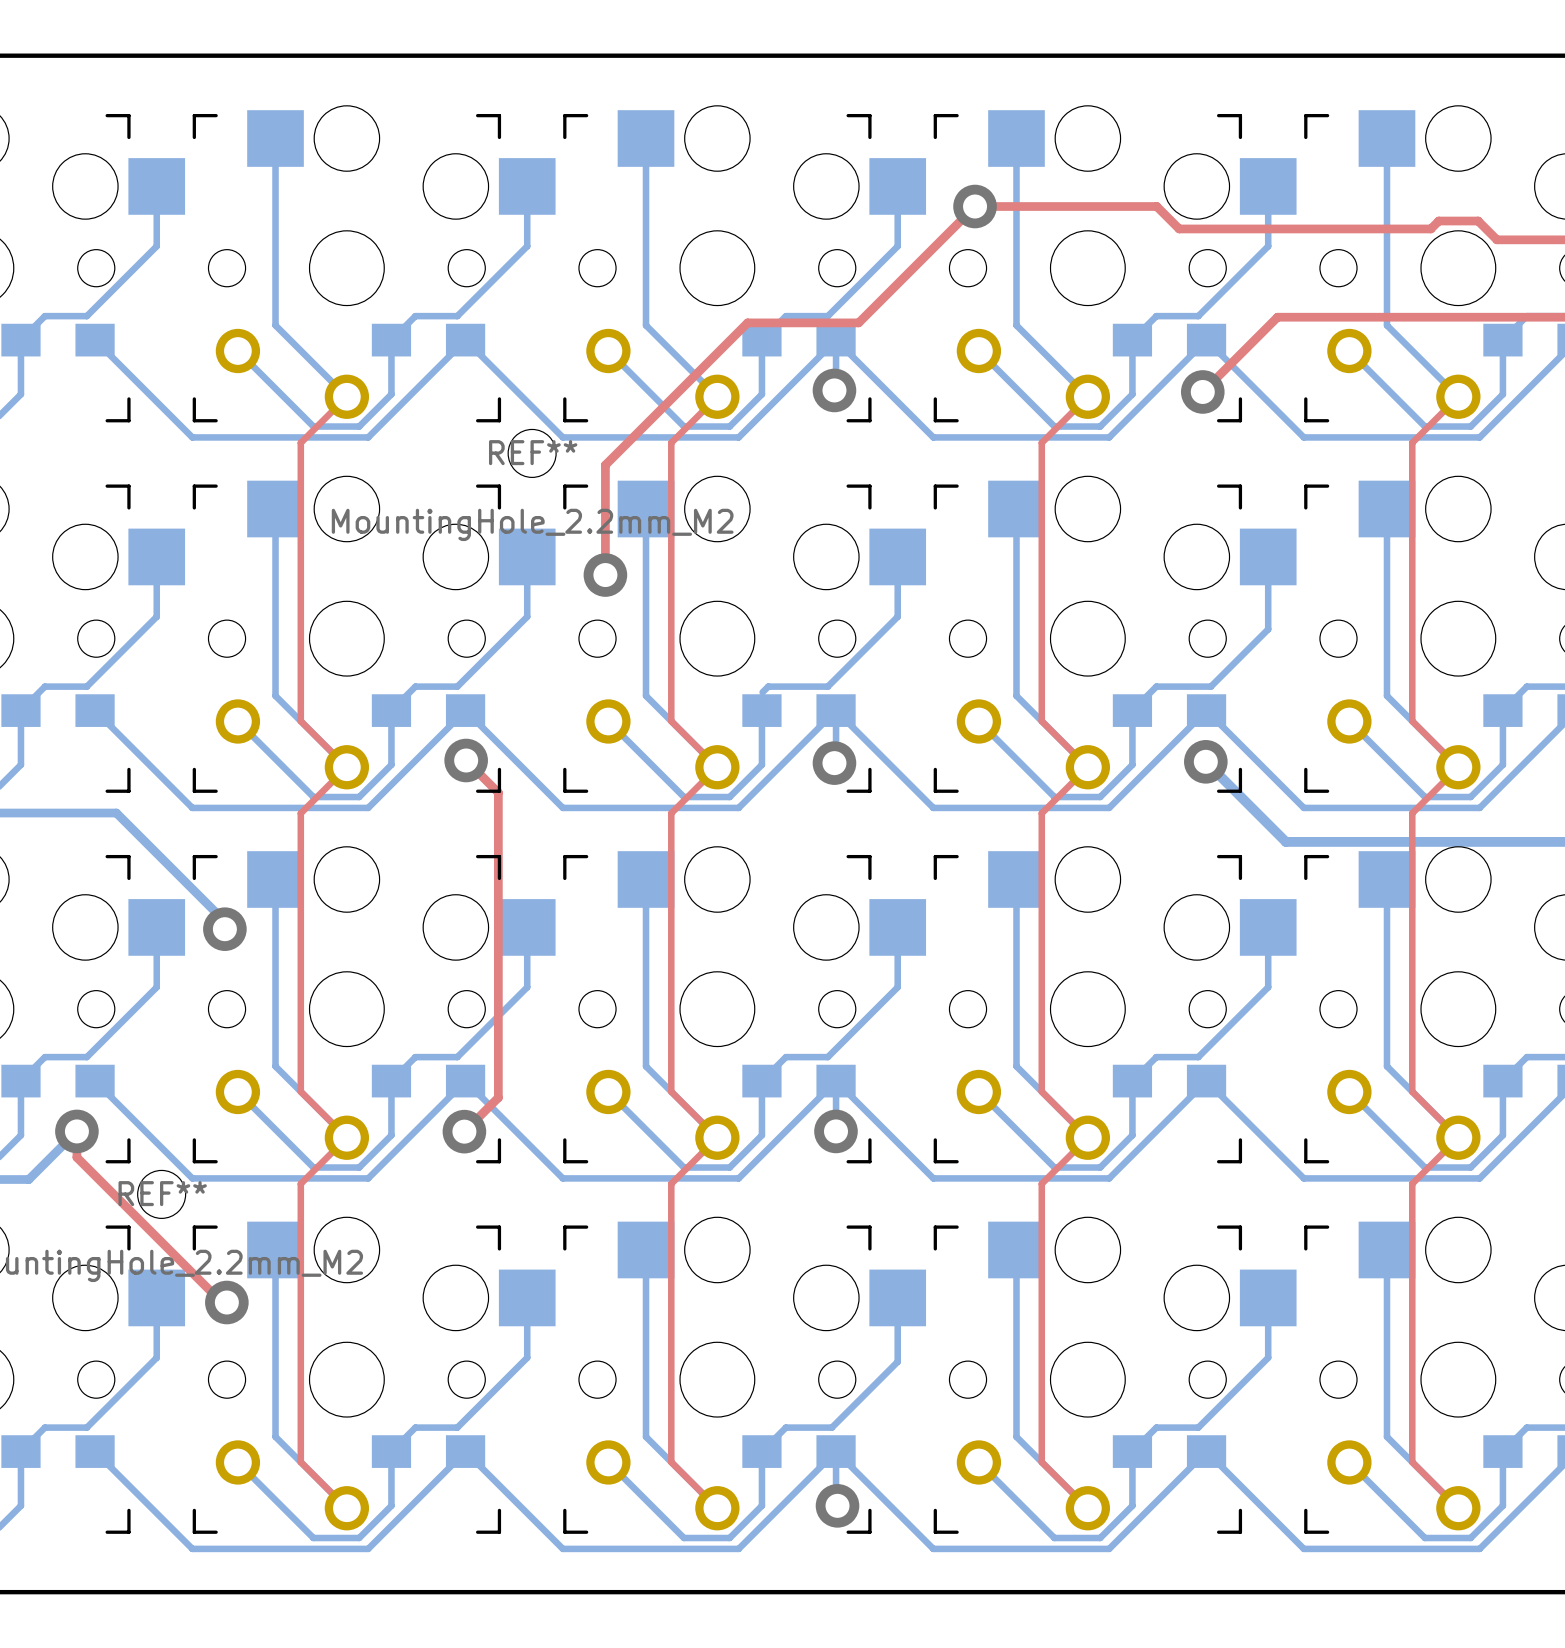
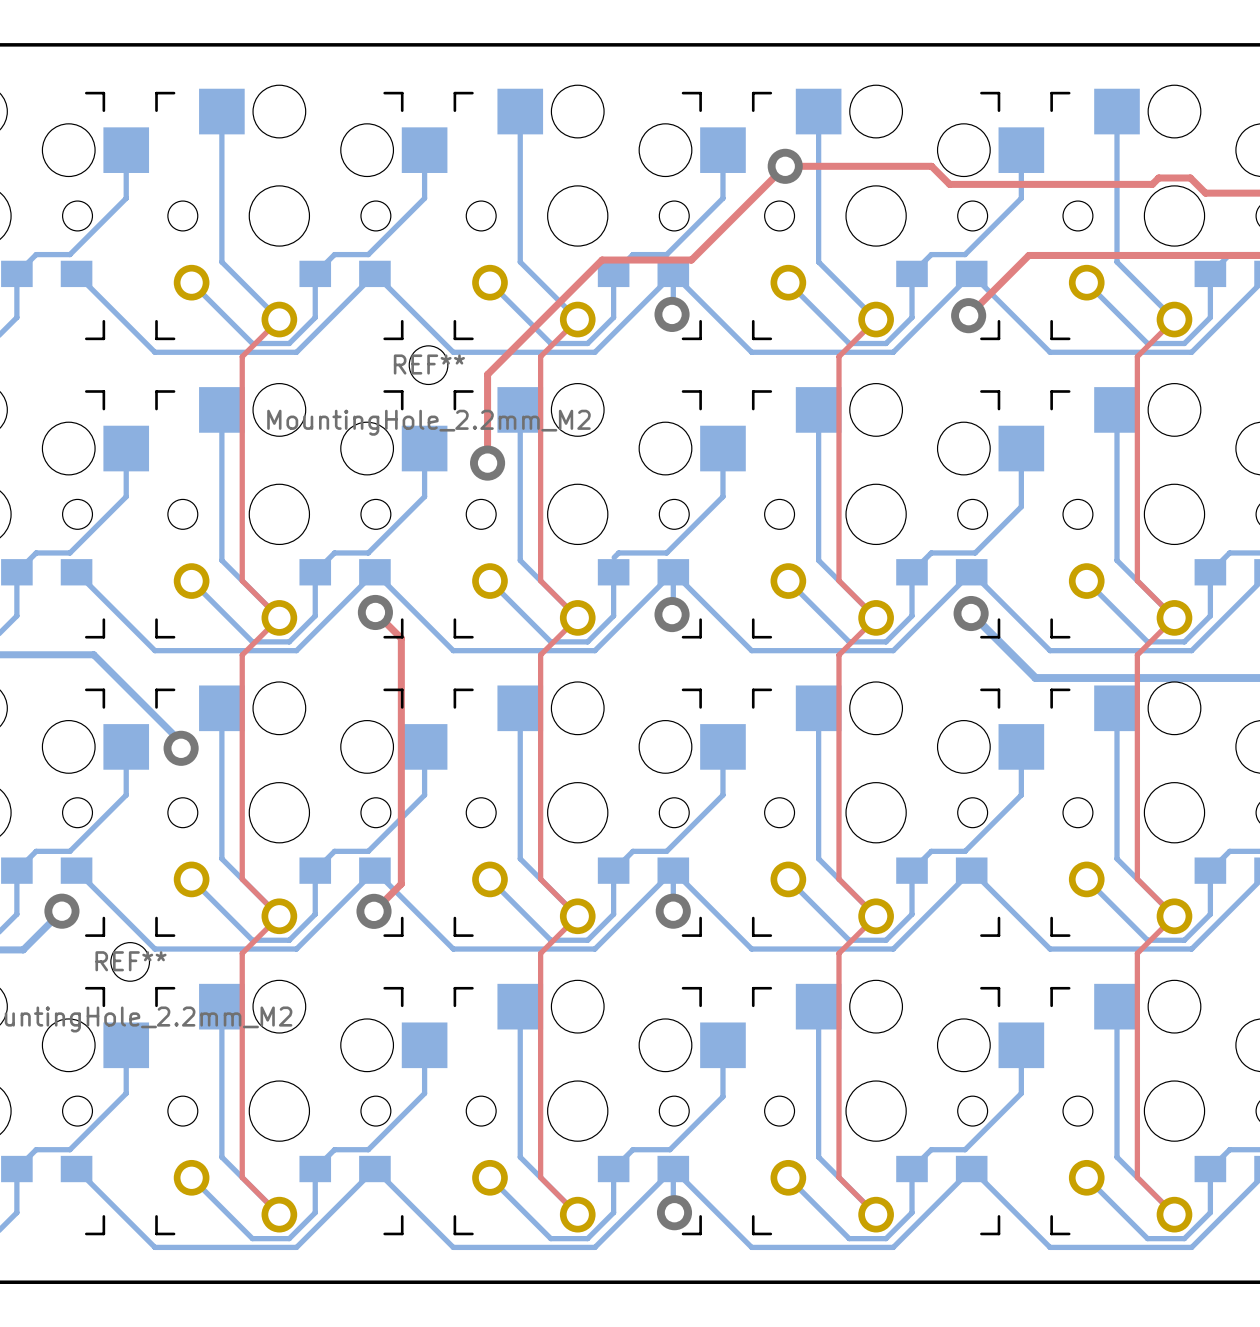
top track: (76, 1131) (76, 1157) (221, 1302) (226, 1302) -> none
via: (226, 1302) -> none

